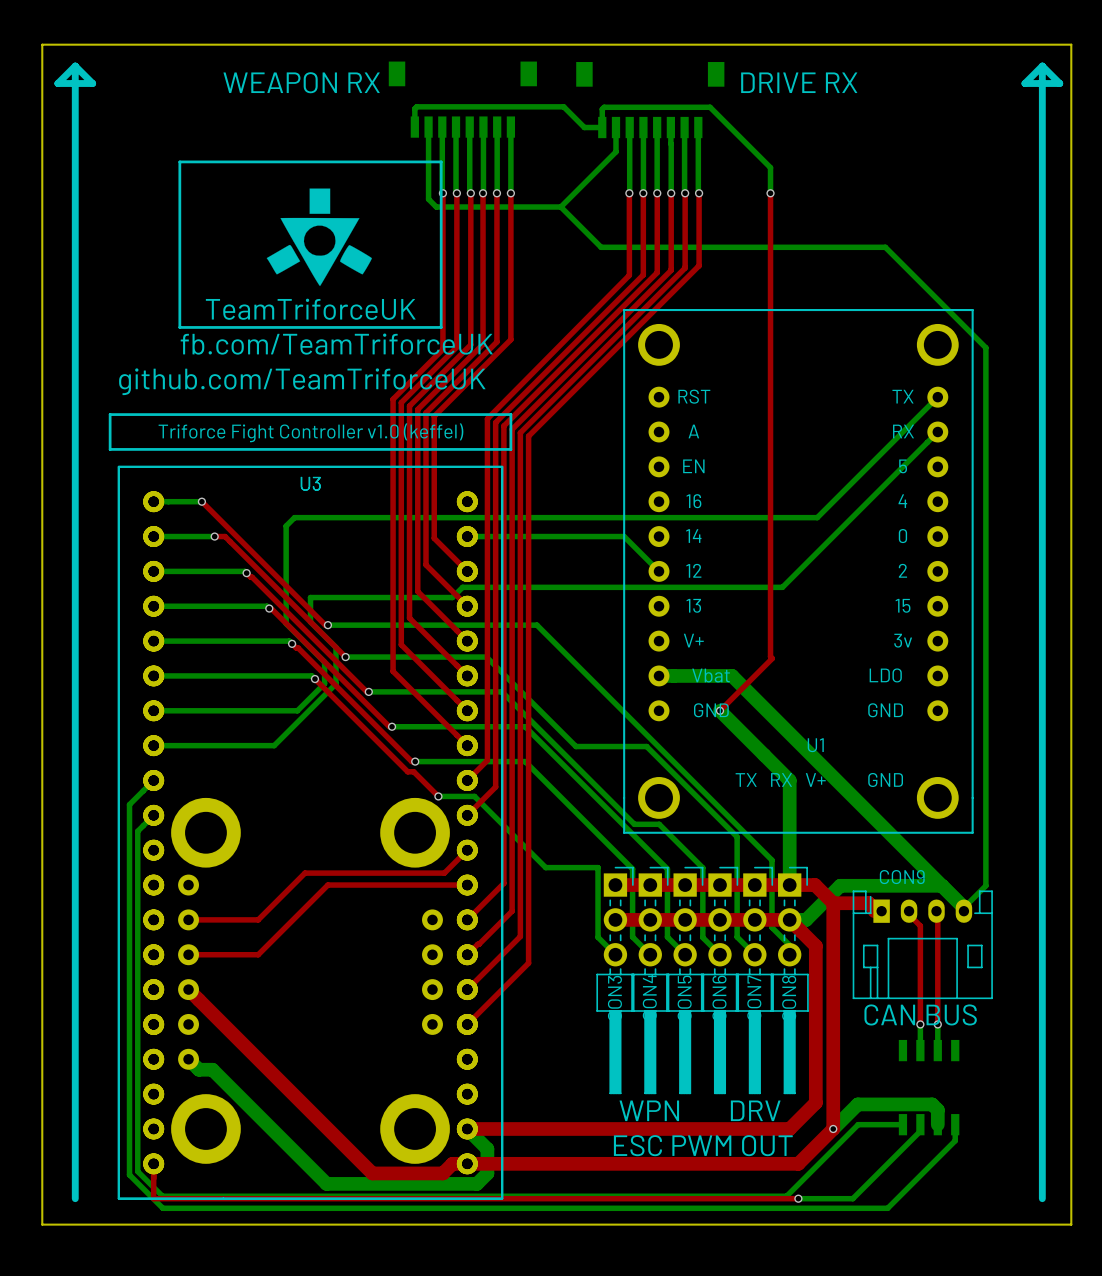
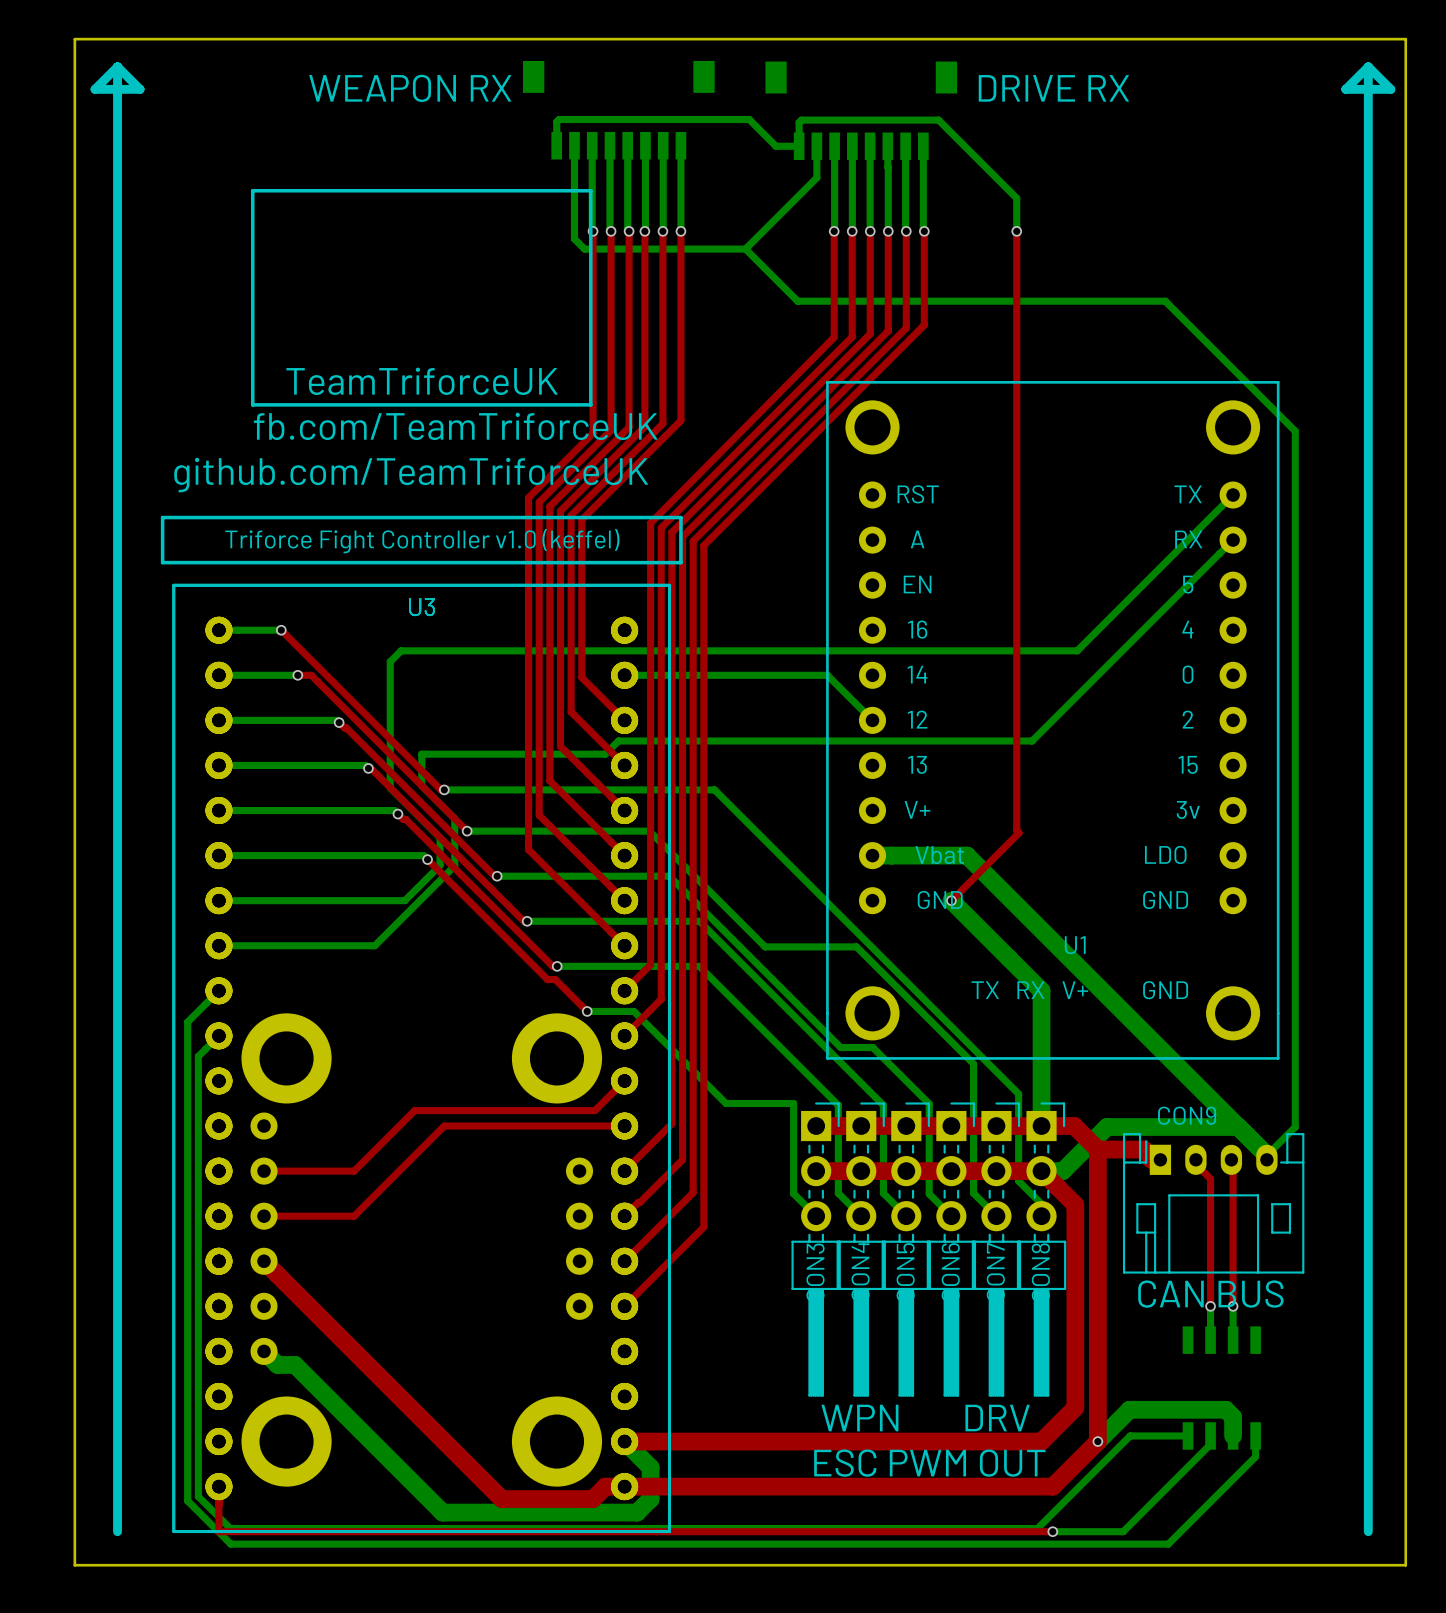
drawing: [266, 188, 372, 287] -> none

